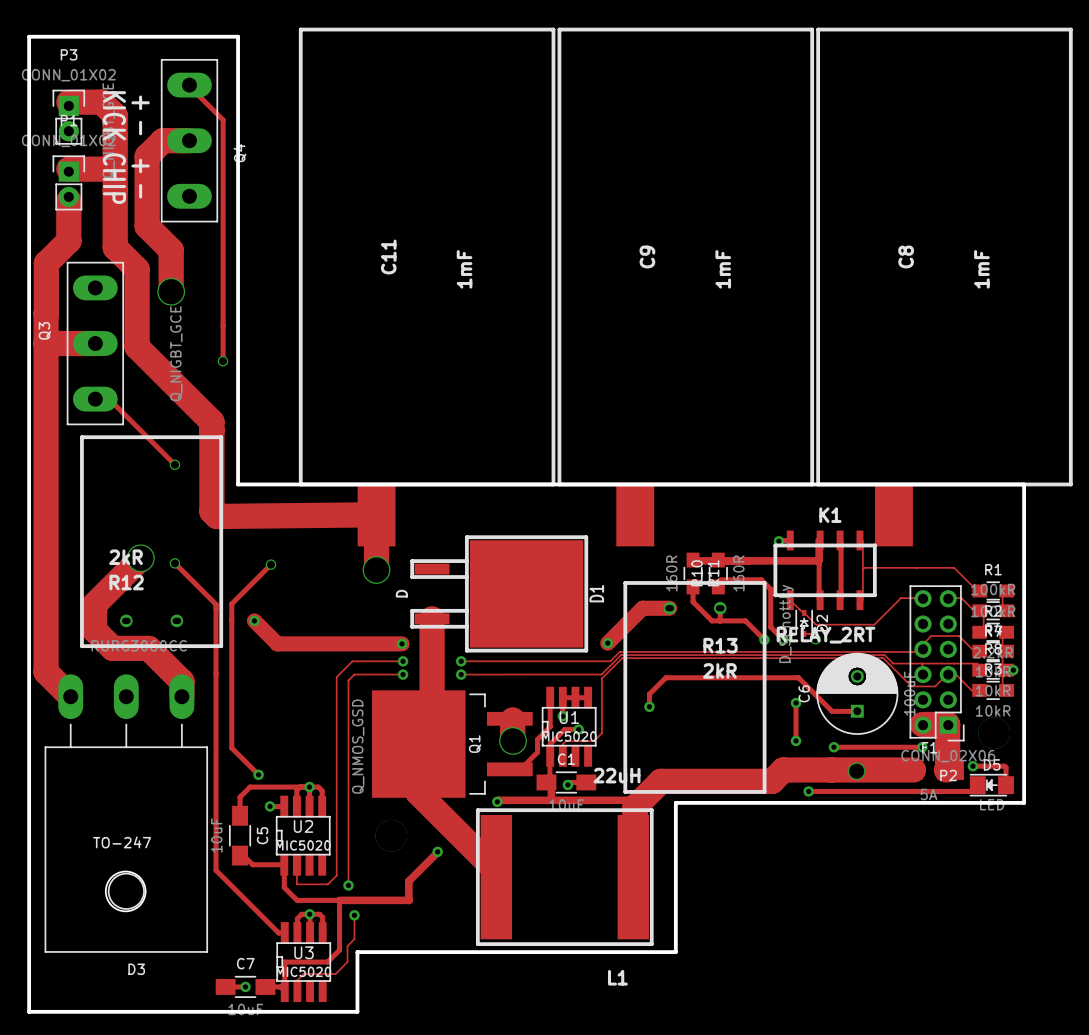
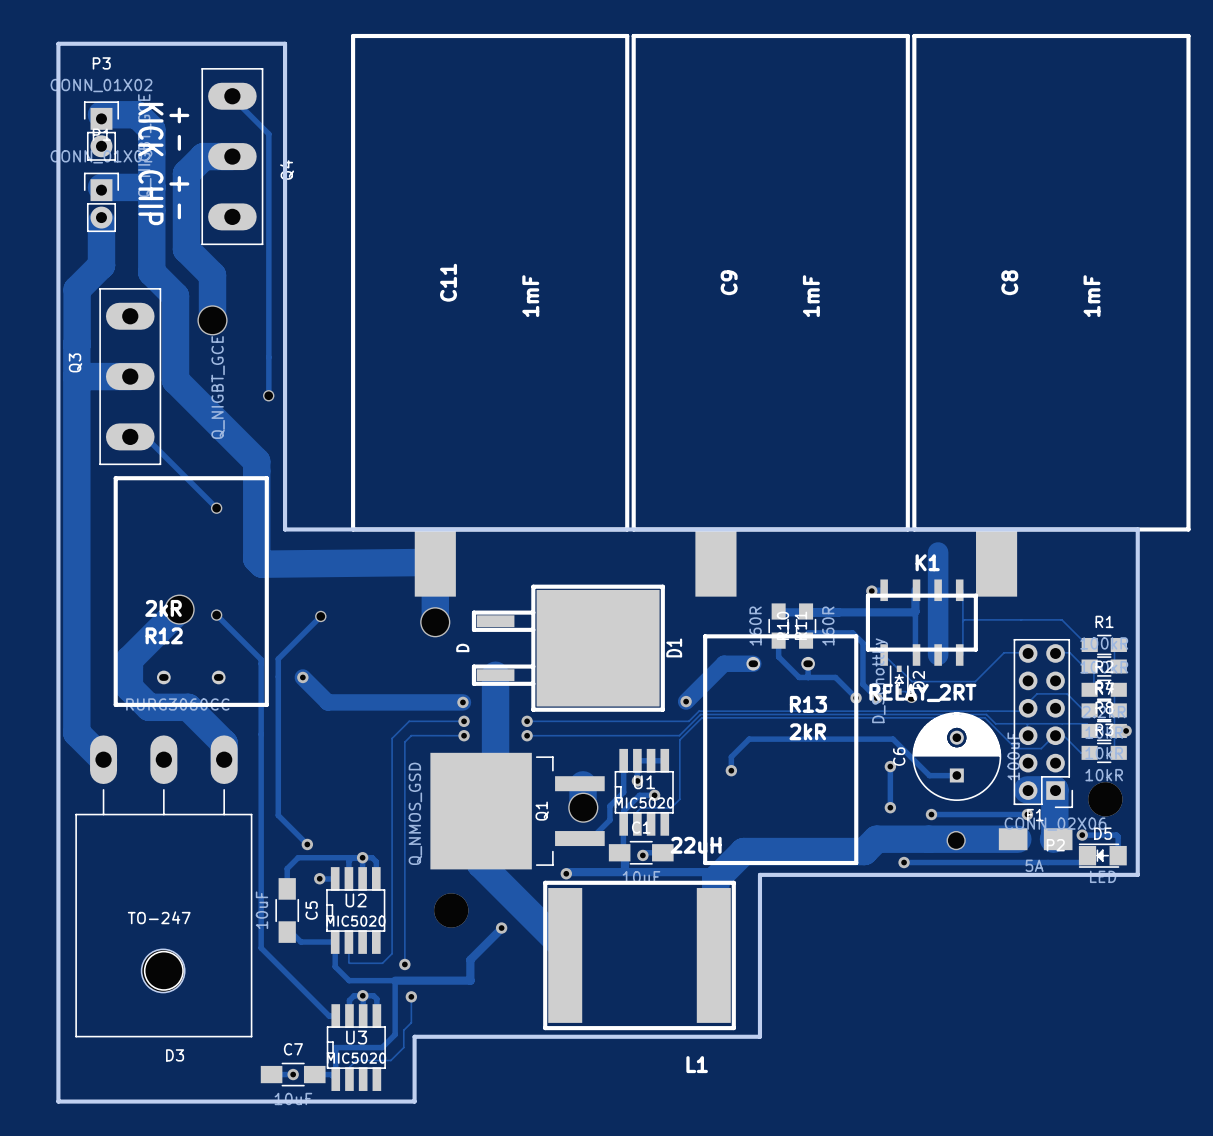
track: none -> (938, 552) (938, 655)

